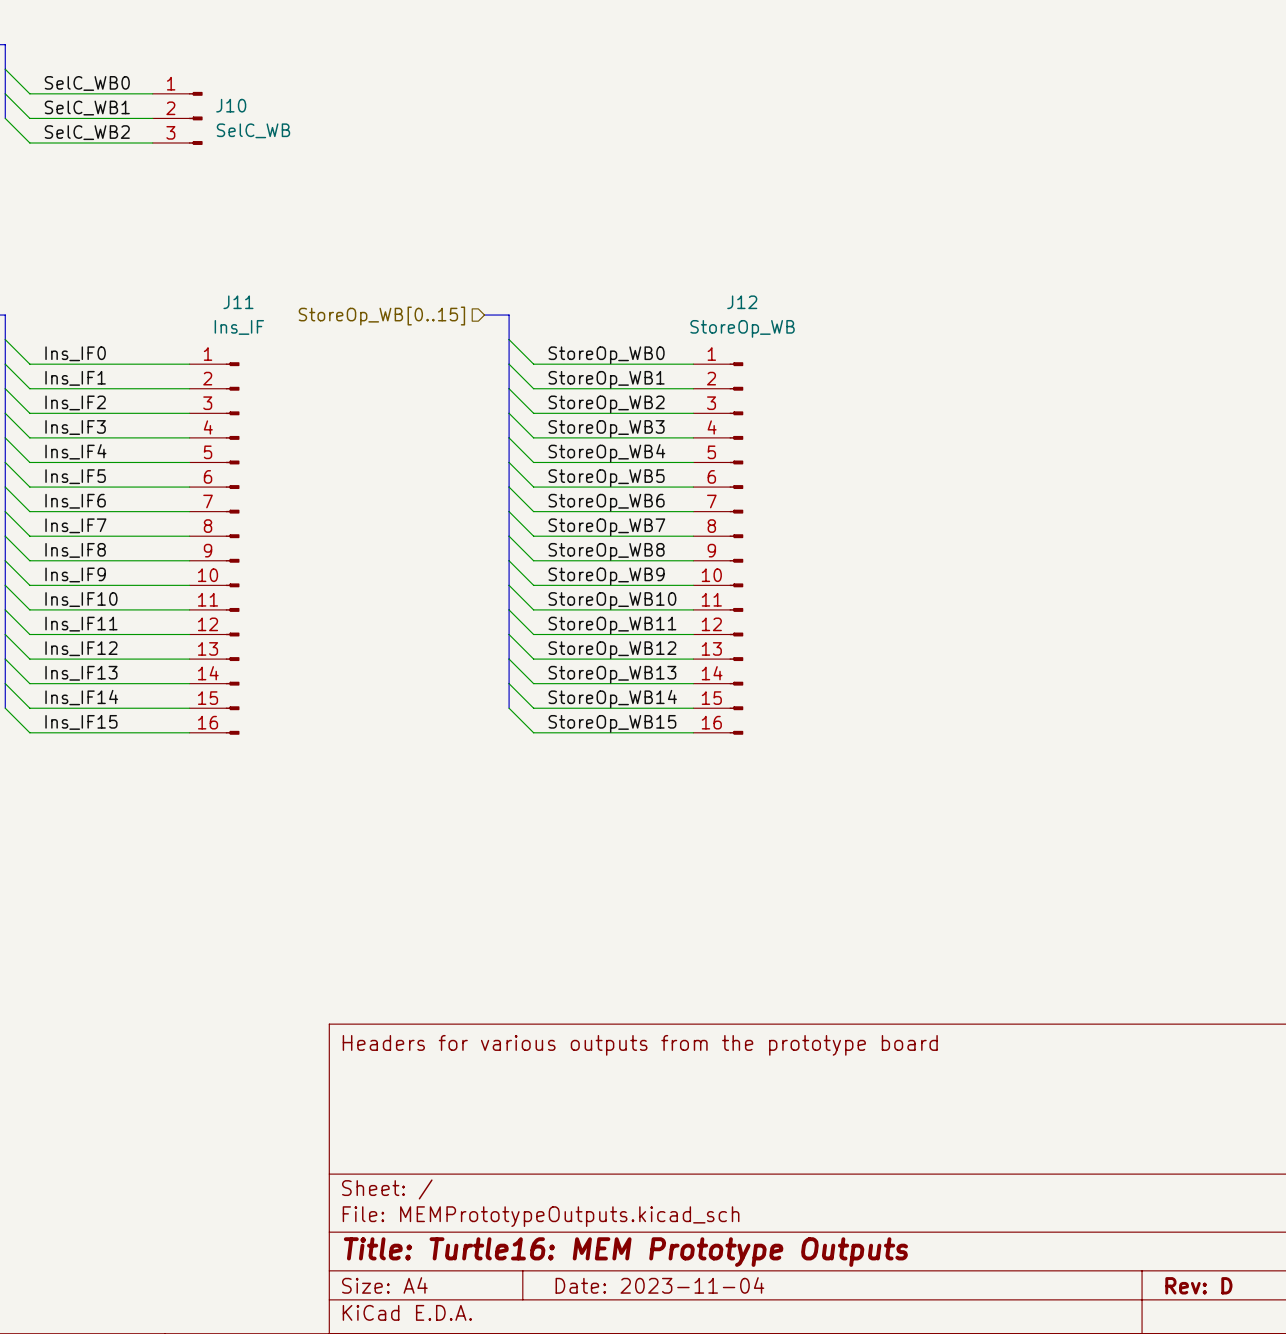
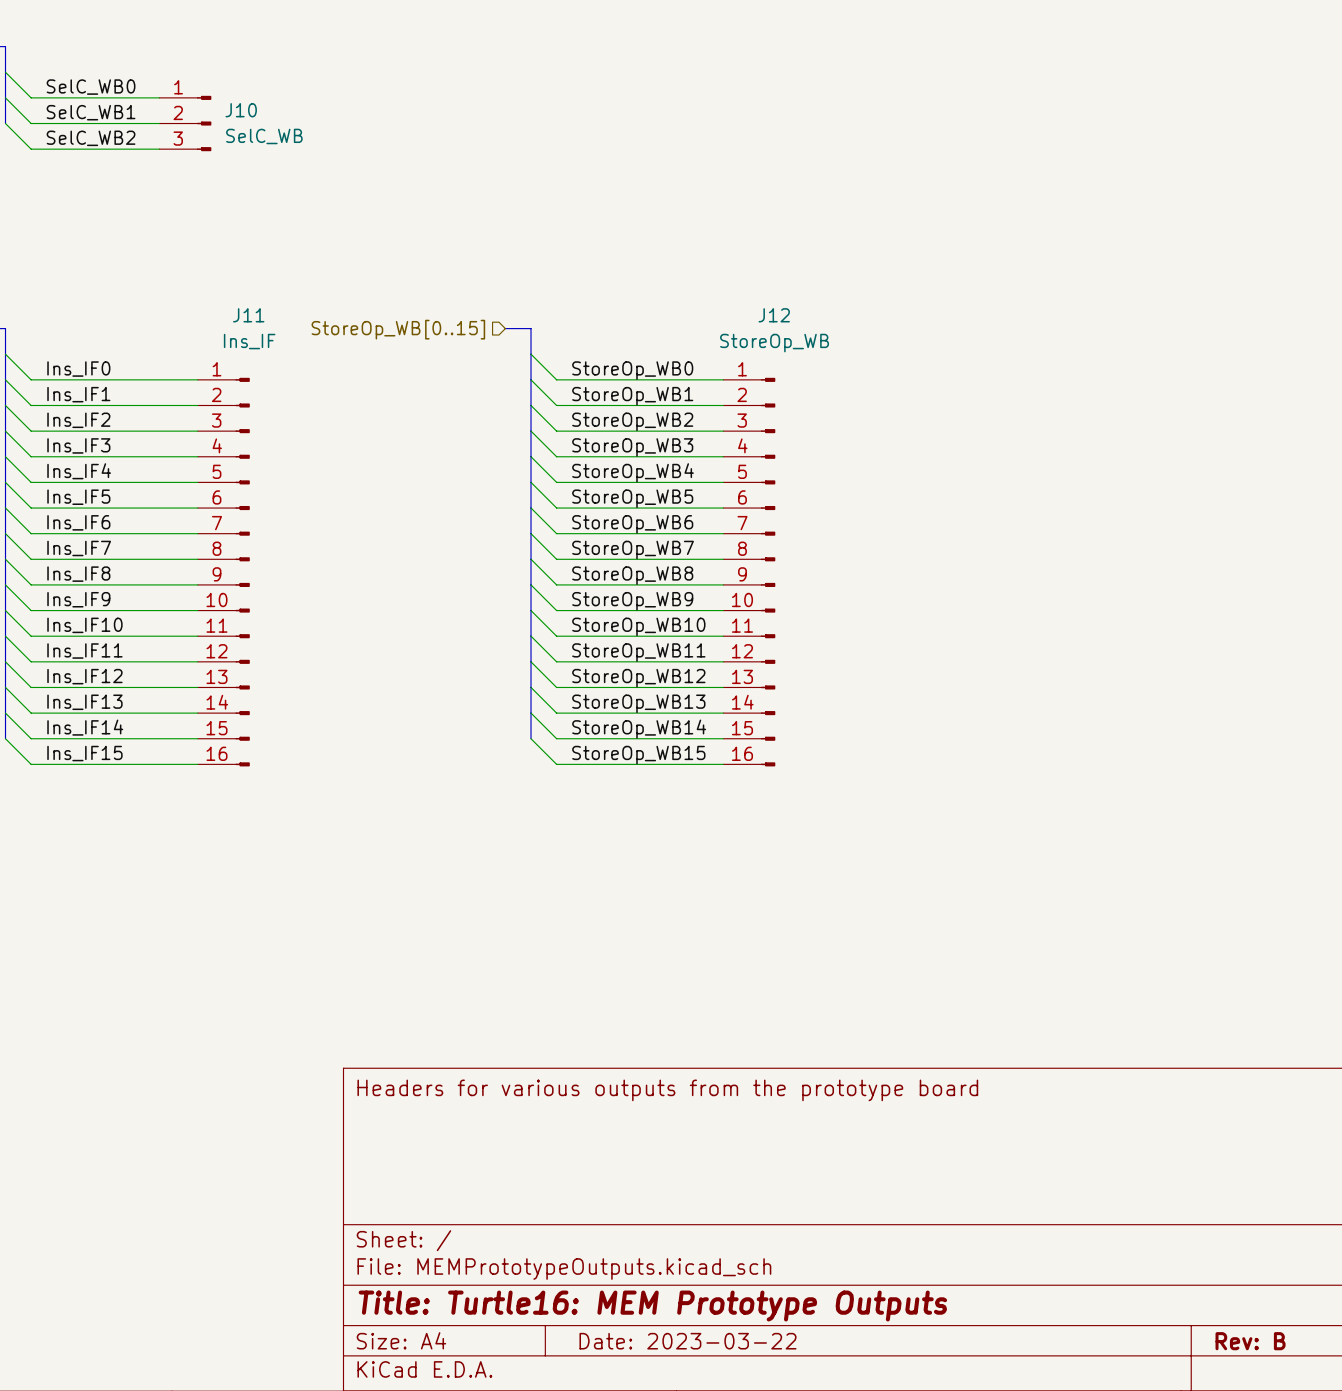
title block: Date: 2023-11-04 (659, 1285) -> Date: 2023-03-22 (688, 1341)
title block: Rev: D (1198, 1285) -> Rev: B (1250, 1341)

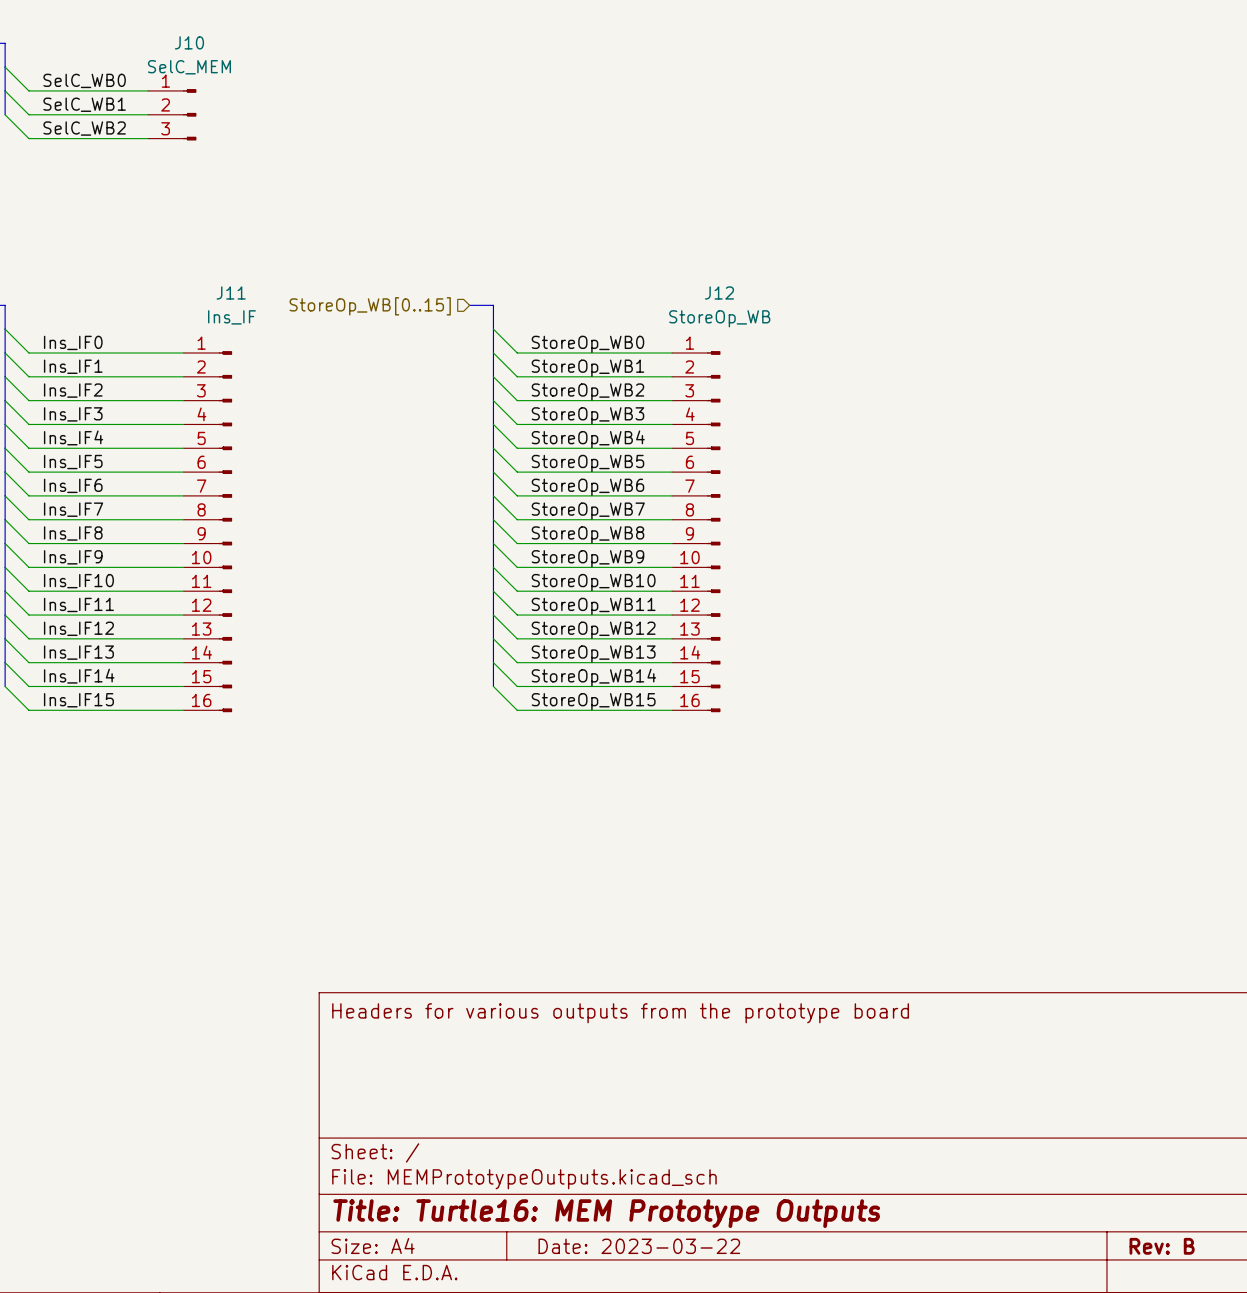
J10 name position: J10 (241, 110) -> J10 (189, 42)
J10 value: SelC_WB (264, 136) -> SelC_MEM (189, 67)

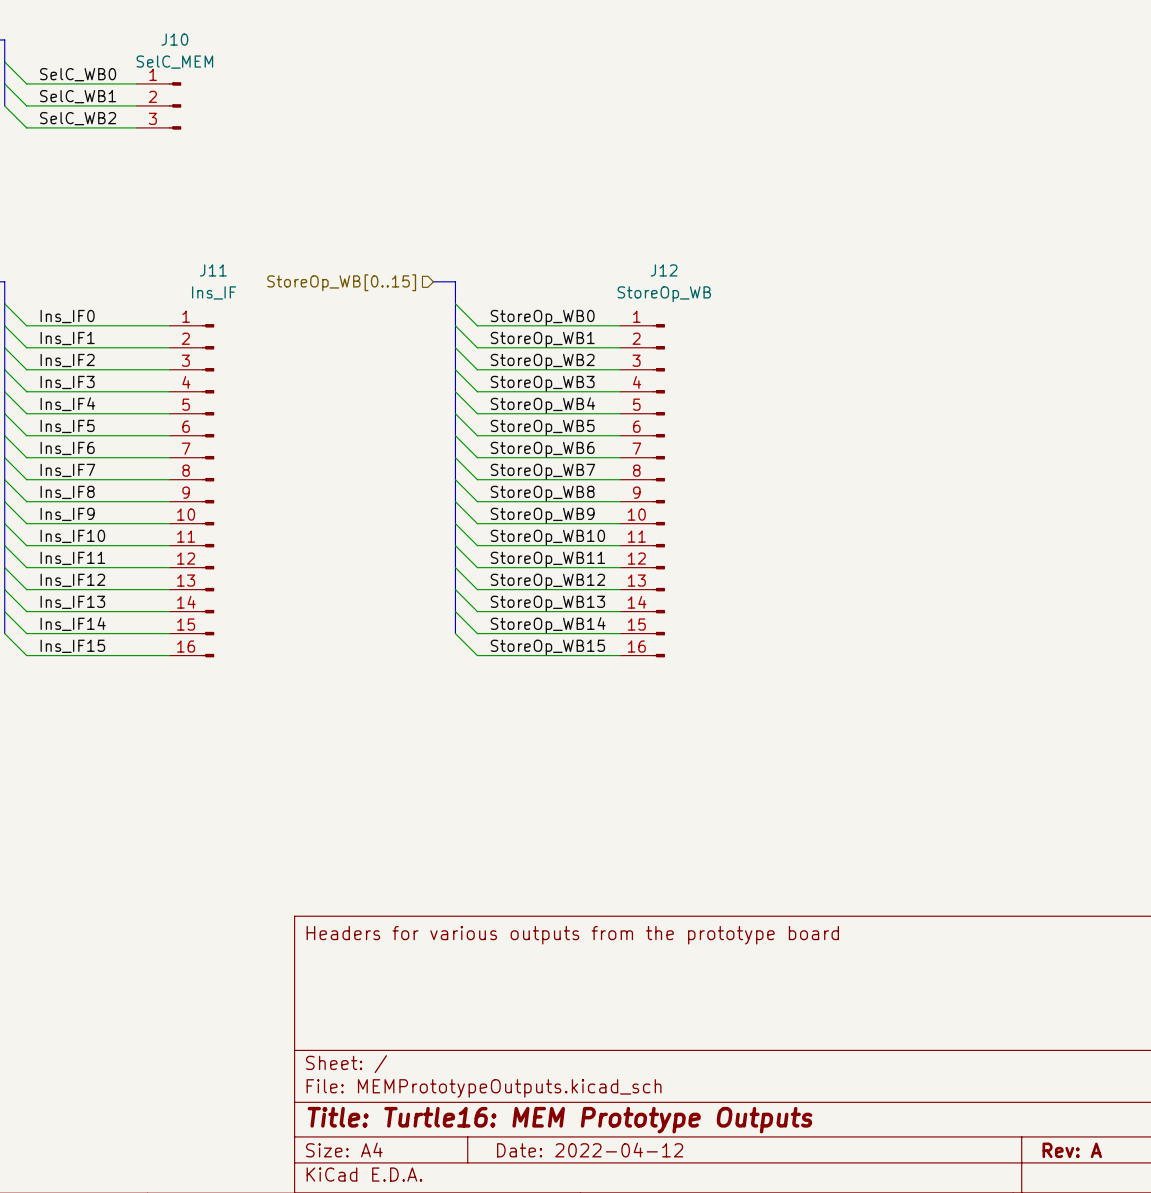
title block: Date: 2023-03-22 (639, 1246) -> Date: 2022-04-12 (590, 1150)
title block: Rev: B (1162, 1246) -> Rev: A (1072, 1150)

